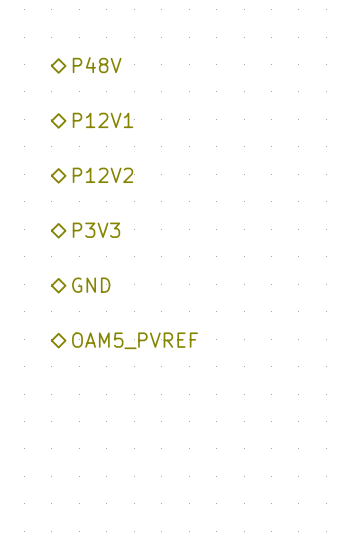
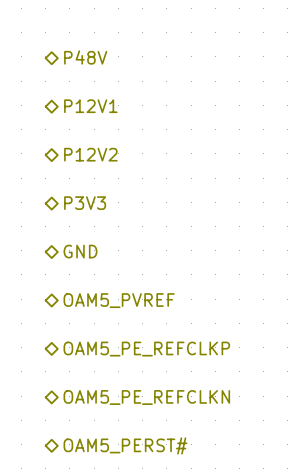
hierarchical label: none -> OAM5_PE_REFCLKP (146, 349)
hierarchical label: none -> OAM5_PE_REFCLKN (146, 397)
hierarchical label: none -> OAM5_PERST# (125, 445)

